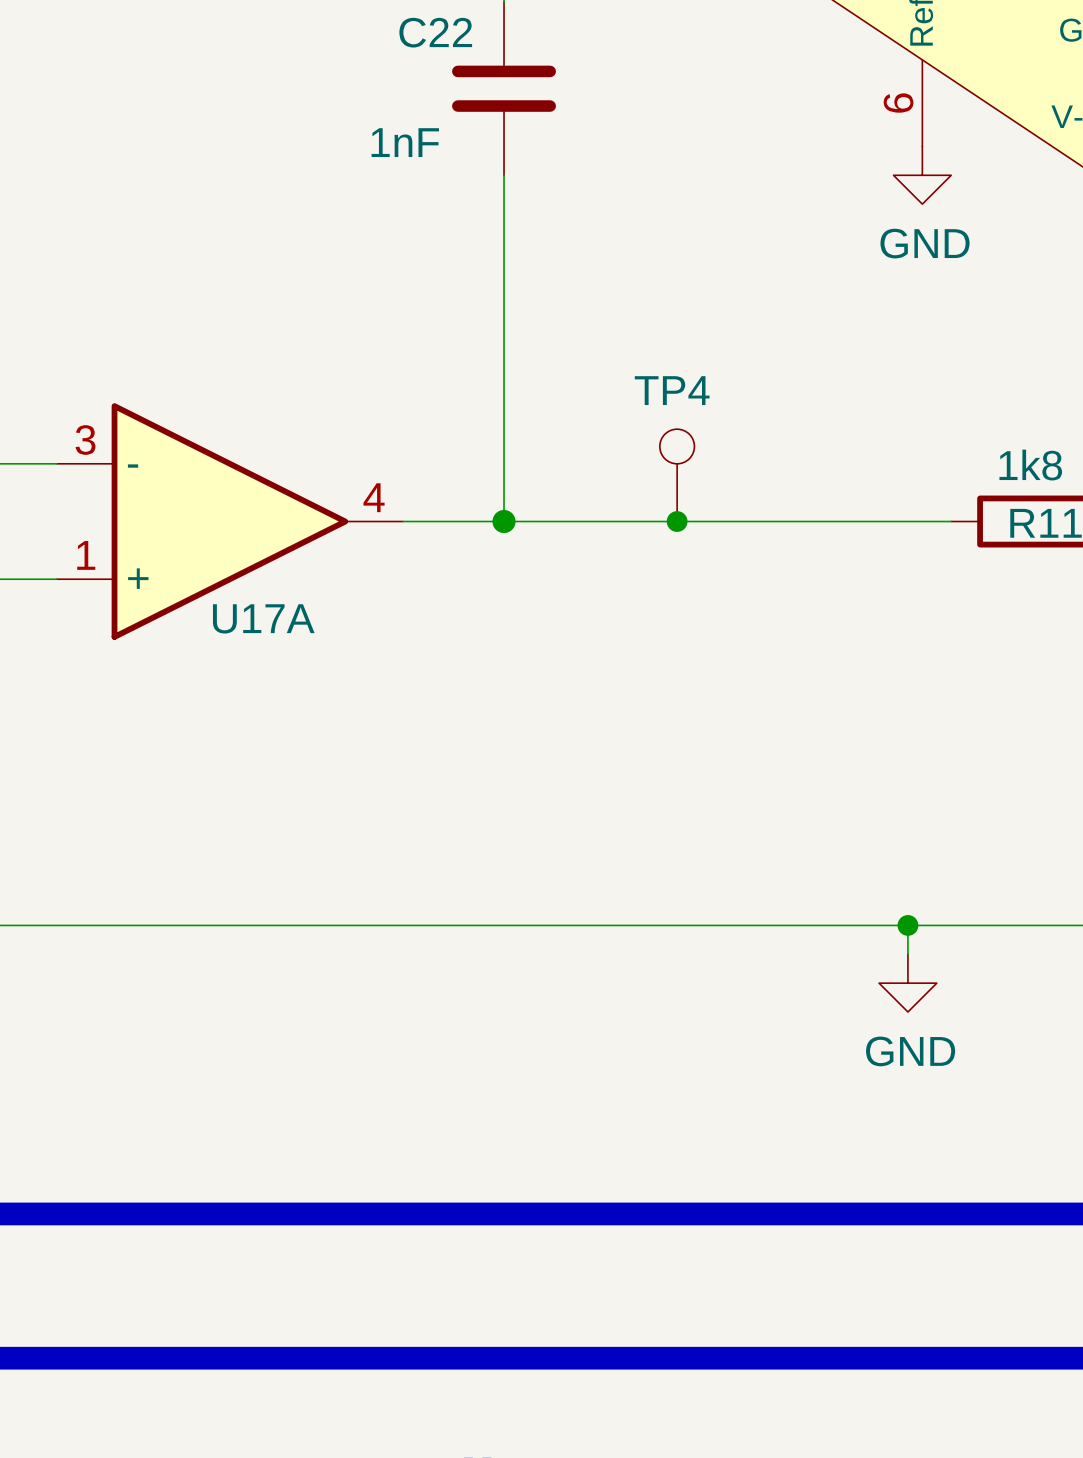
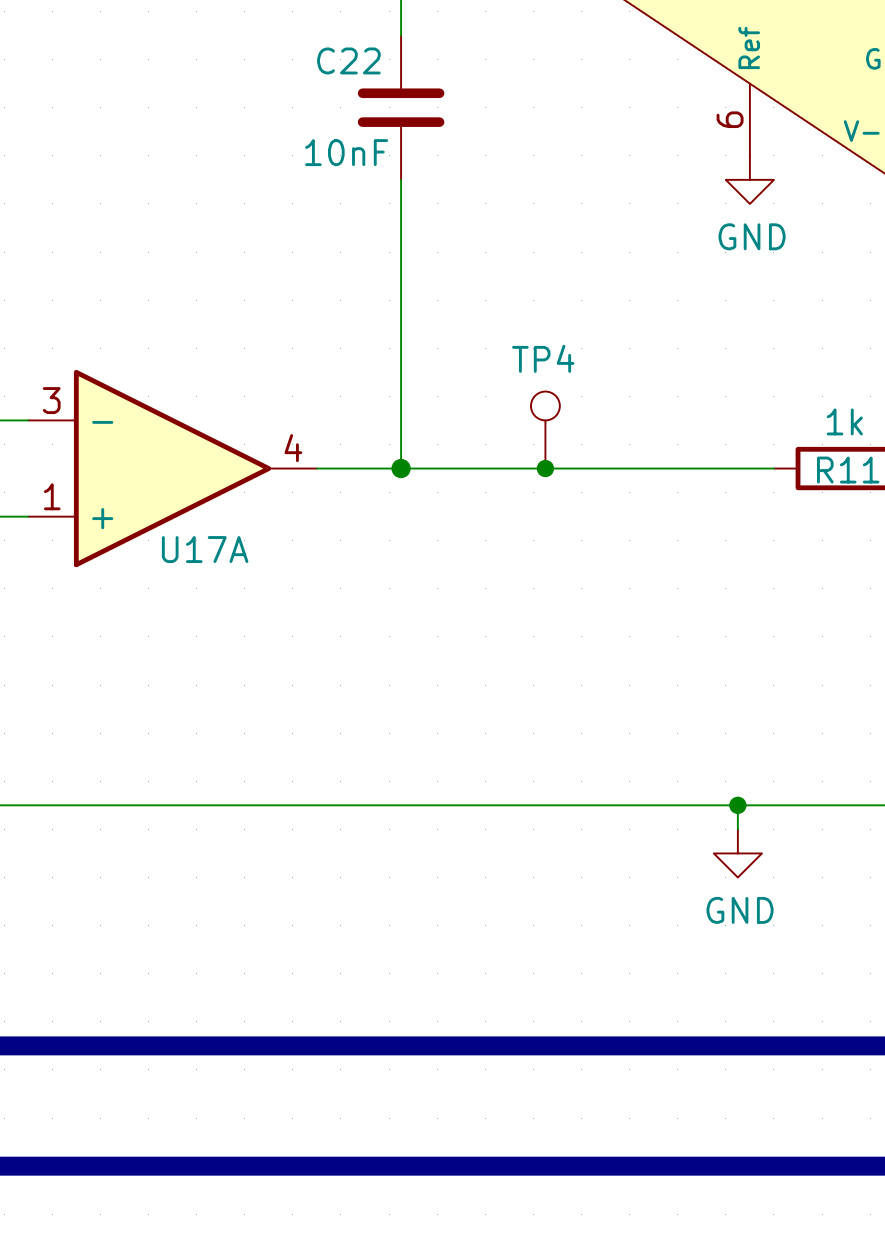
C22 value: 1nF (405, 142) -> 10nF (346, 152)
R11 value: 1k8 (1030, 465) -> 1k (844, 421)

